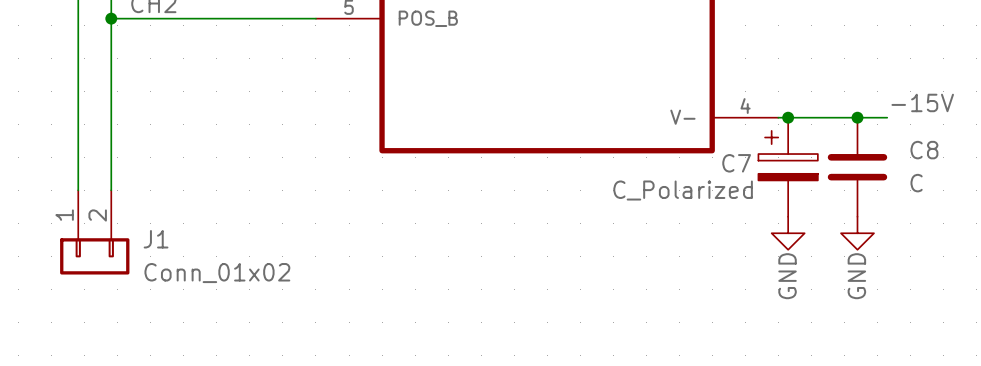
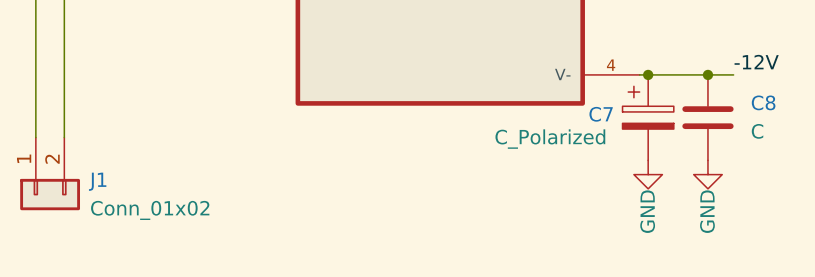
label: -15V (922, 102) -> -12V (756, 62)

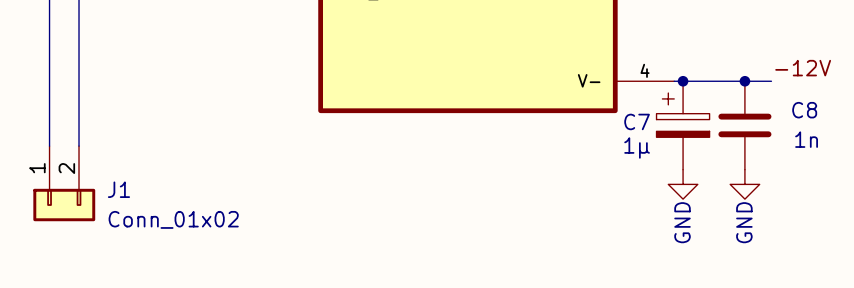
C8 value: C (757, 131) -> 1n (806, 139)
C7 value: C_Polarized (550, 139) -> 1µ (637, 147)

